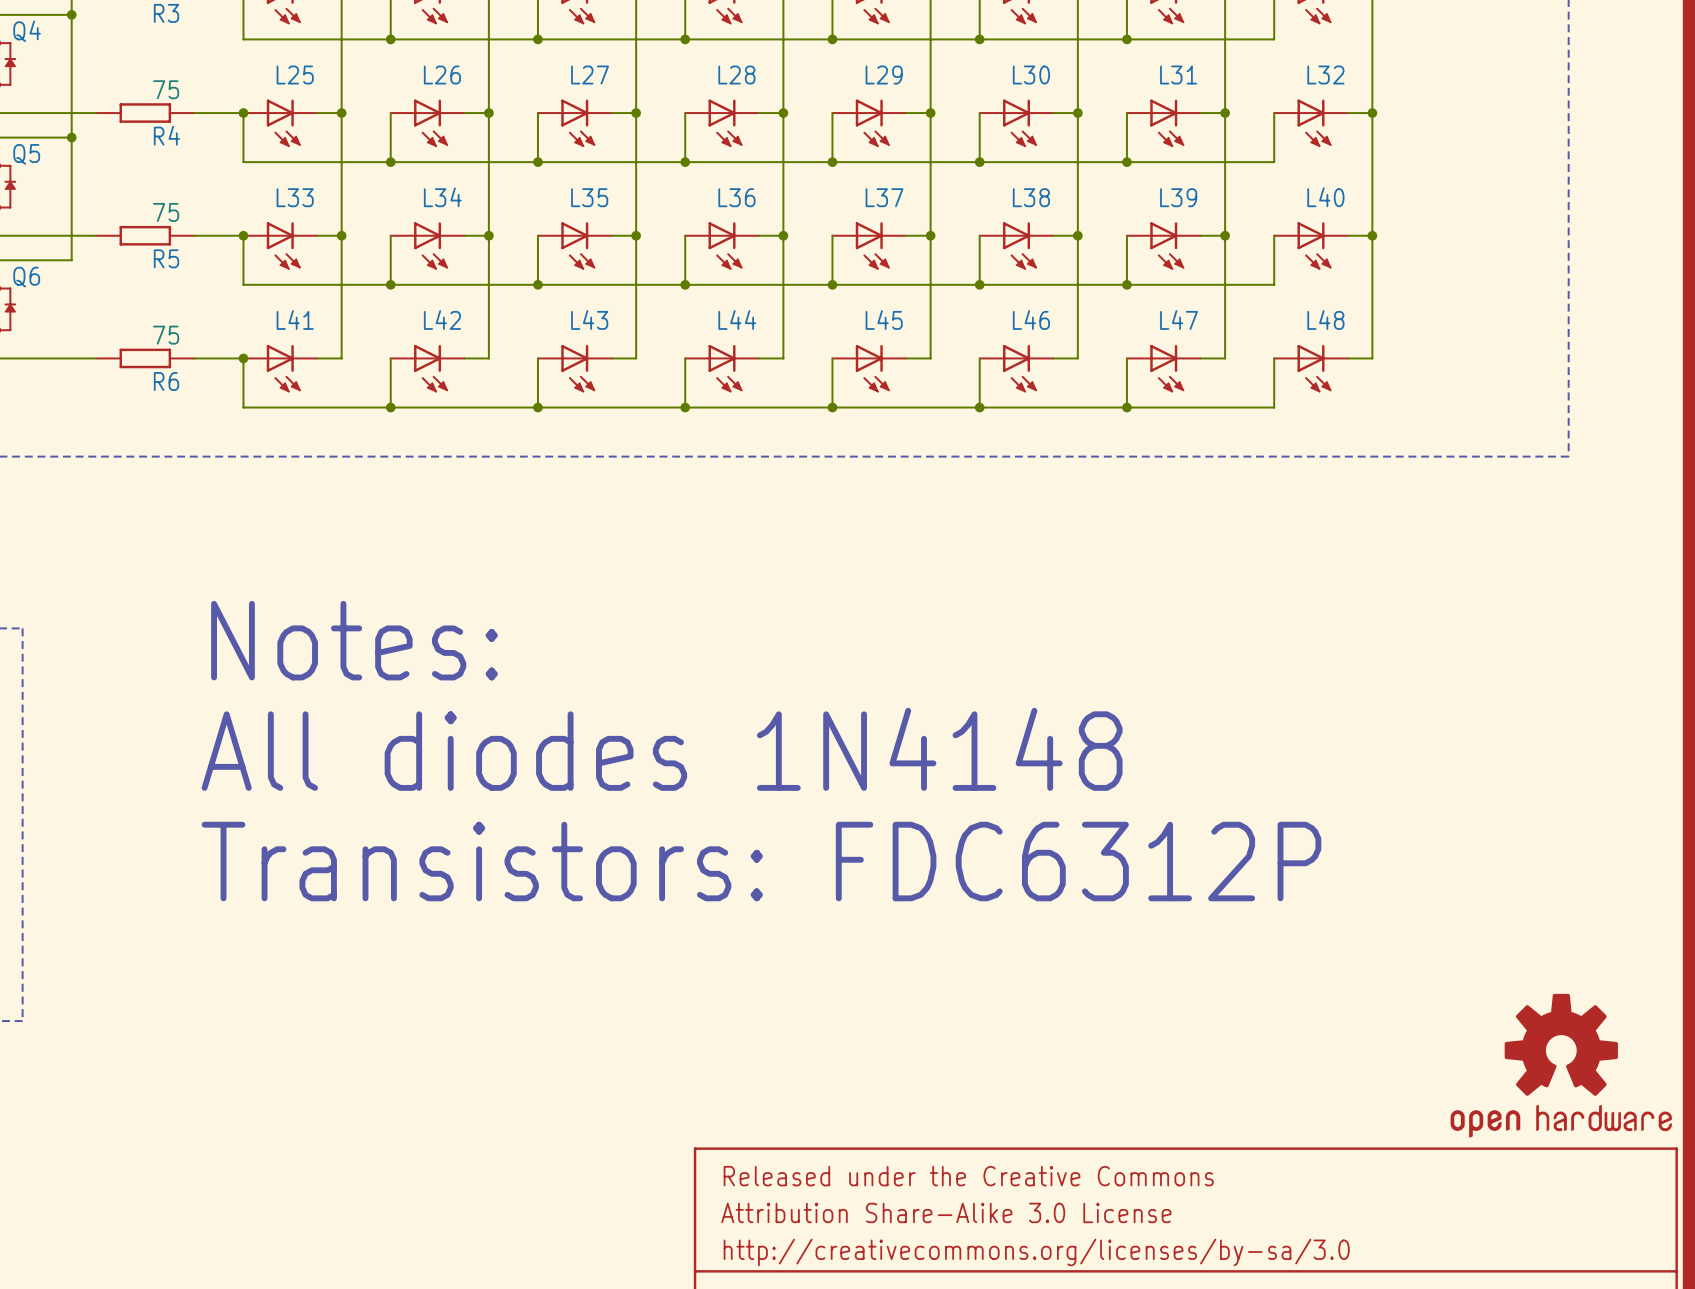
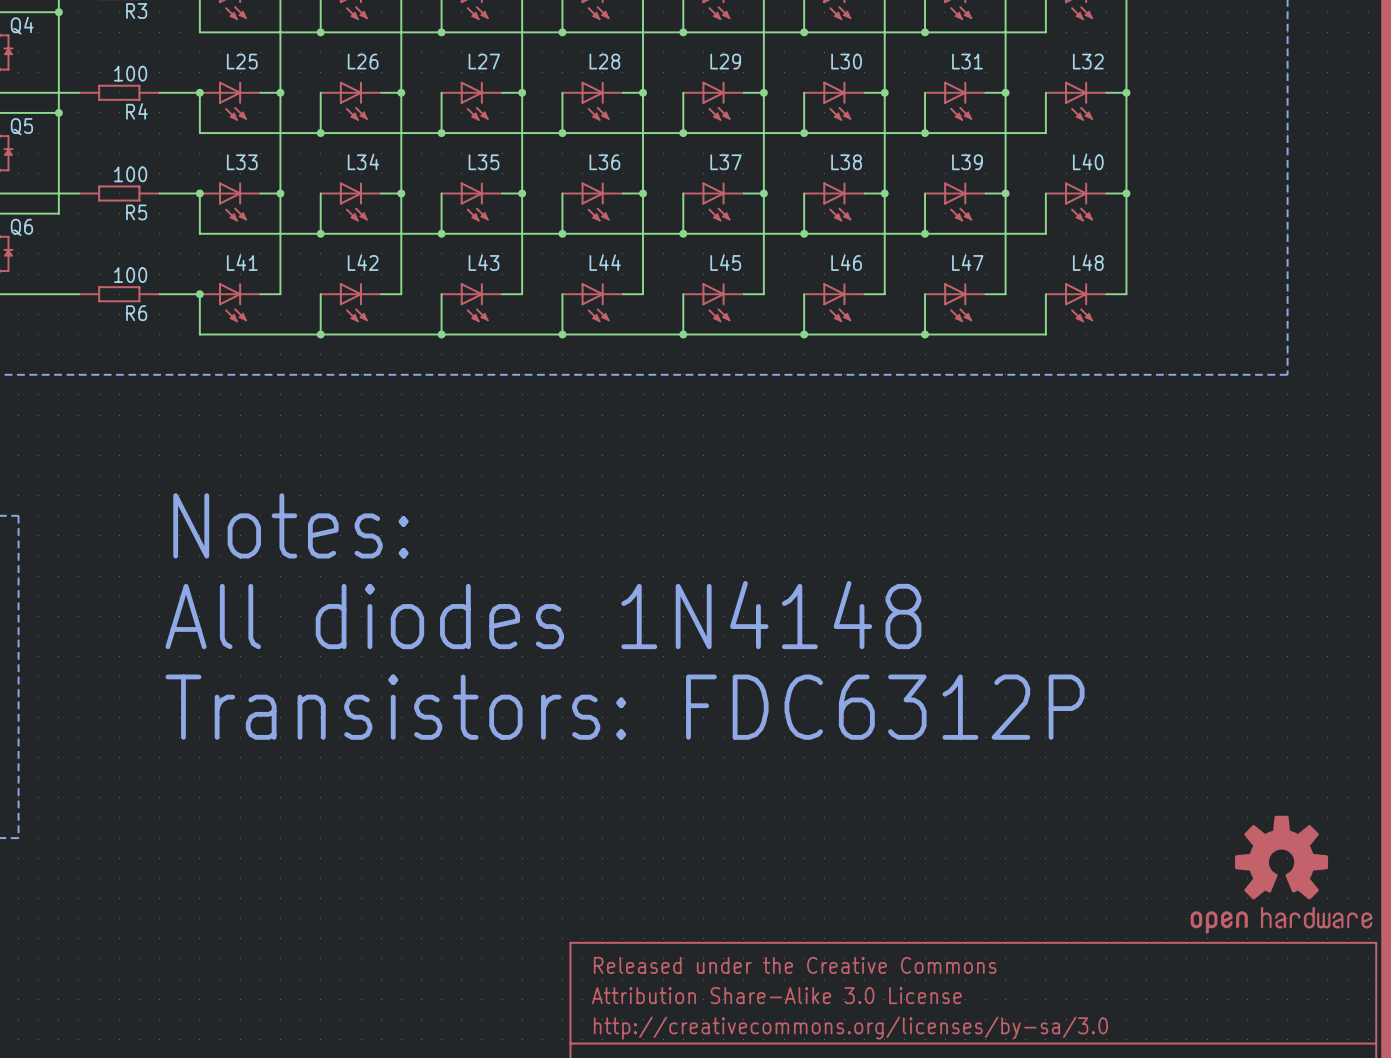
R4 value: 75 (166, 89) -> 100 (130, 73)
R5 value: 75 (166, 212) -> 100 (130, 174)
R6 value: 75 (166, 335) -> 100 (130, 275)

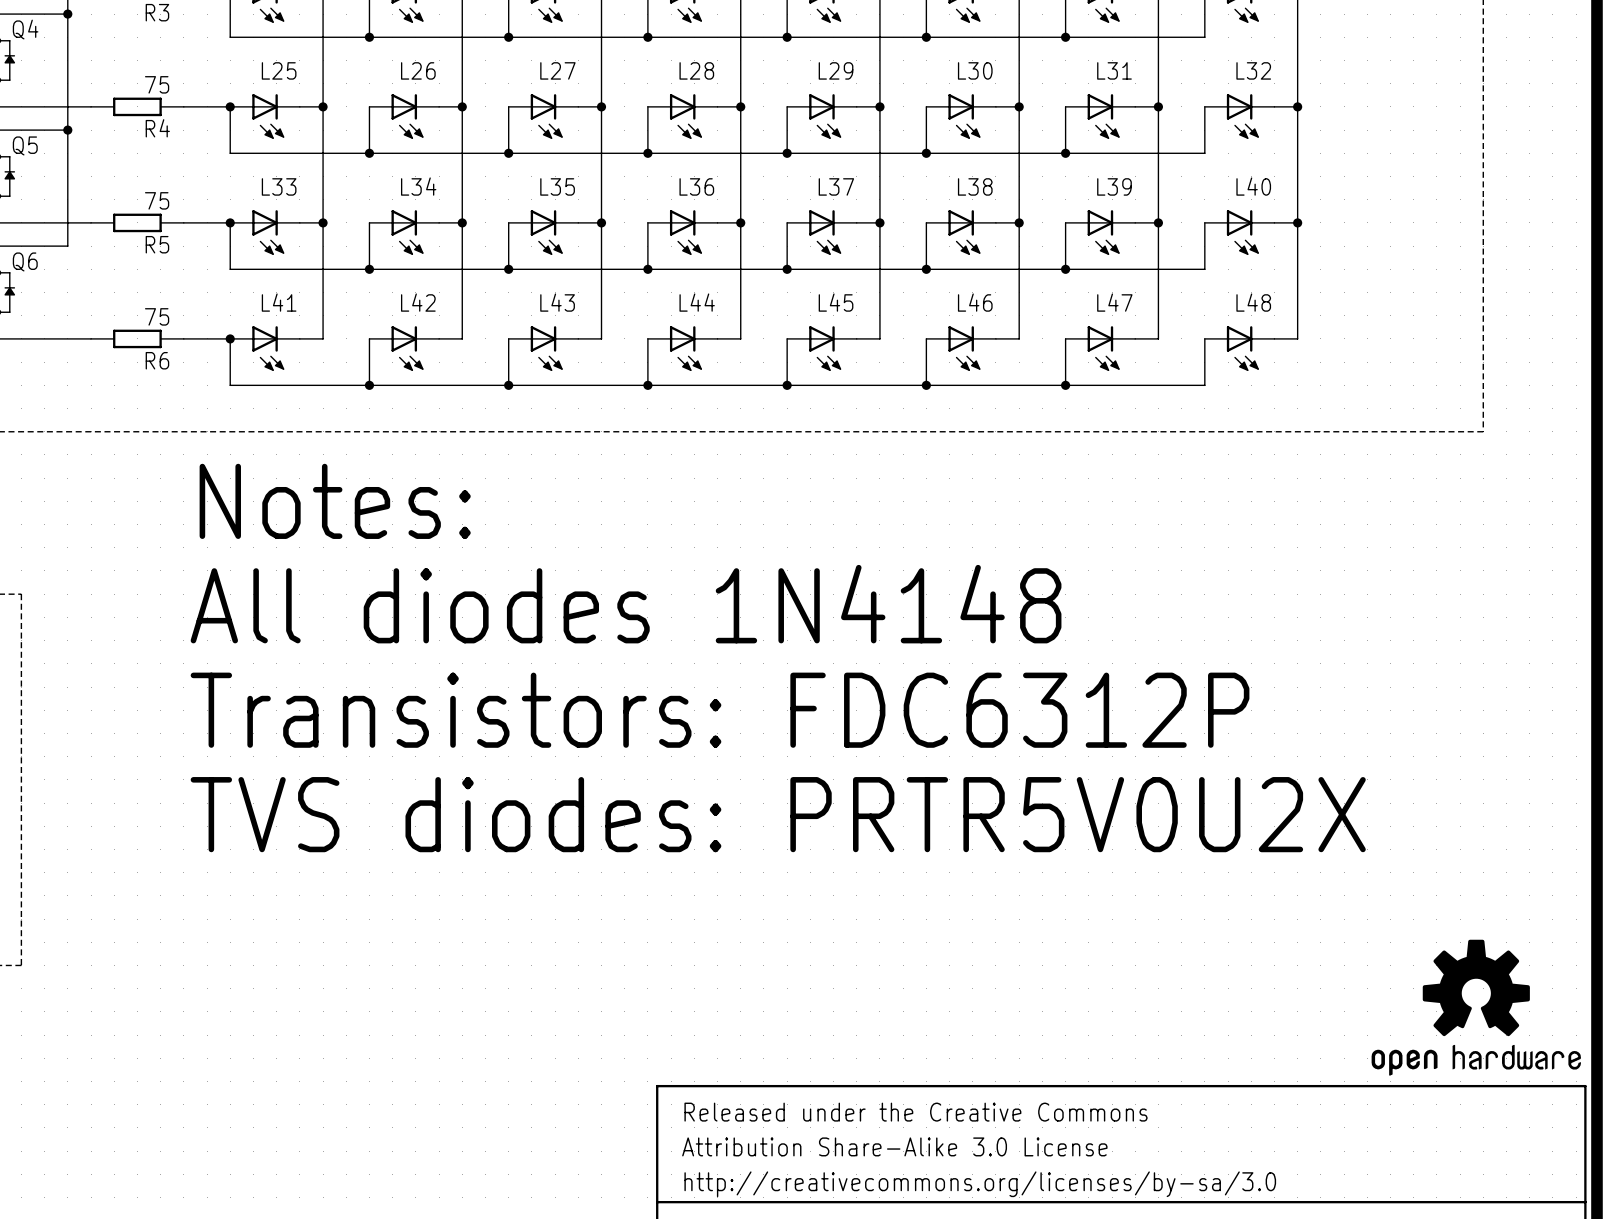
R4 value: 100 (130, 73) -> 75 (157, 84)
R5 value: 100 (130, 174) -> 75 (157, 200)
R6 value: 100 (130, 275) -> 75 (157, 316)
text: none -> Notes: (335, 501)
text: Notes: (290, 525) -> All diodes 1N4148 (626, 604)
text: All diodes 1N4148 (543, 615) -> Transistors: FDC6312P (720, 710)
text: Transistors: FDC6312P (625, 707) -> TVS diodes: PRTR5V0U2X (778, 814)

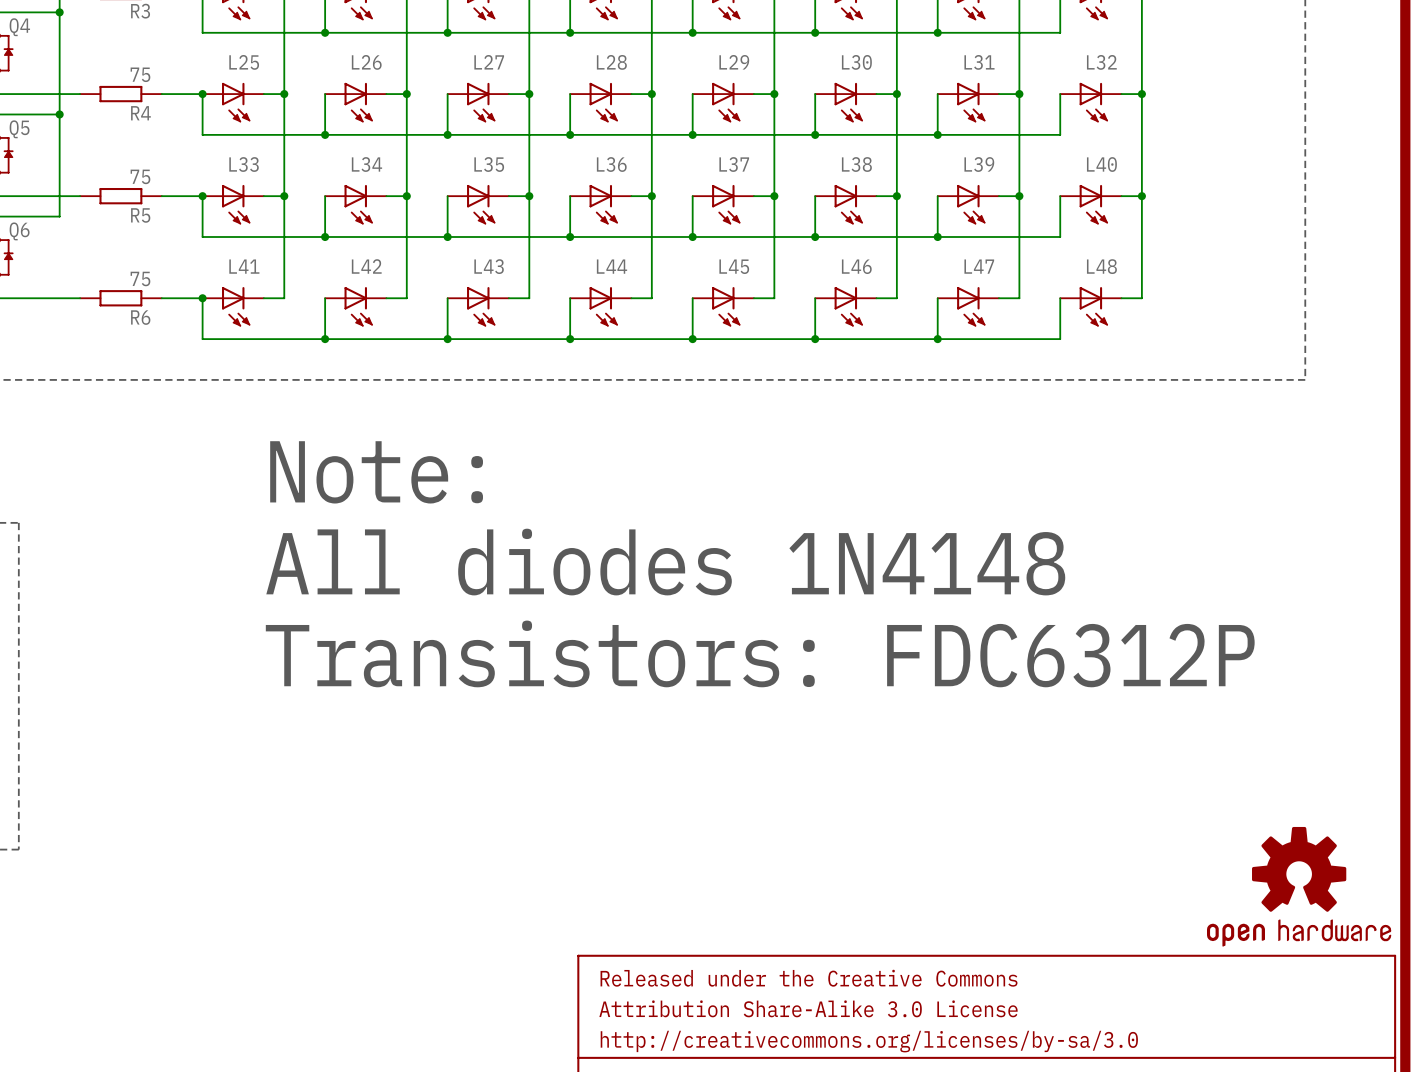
text: Notes: (335, 501) -> Note: (376, 472)
text position: All diodes 1N4148 (626, 604) -> All diodes 1N4148 (665, 562)
text position: Transistors: FDC6312P (720, 710) -> Transistors: FDC6312P (760, 653)
text: TVS diodes: PRTR5V0U2X (778, 814) -> none

